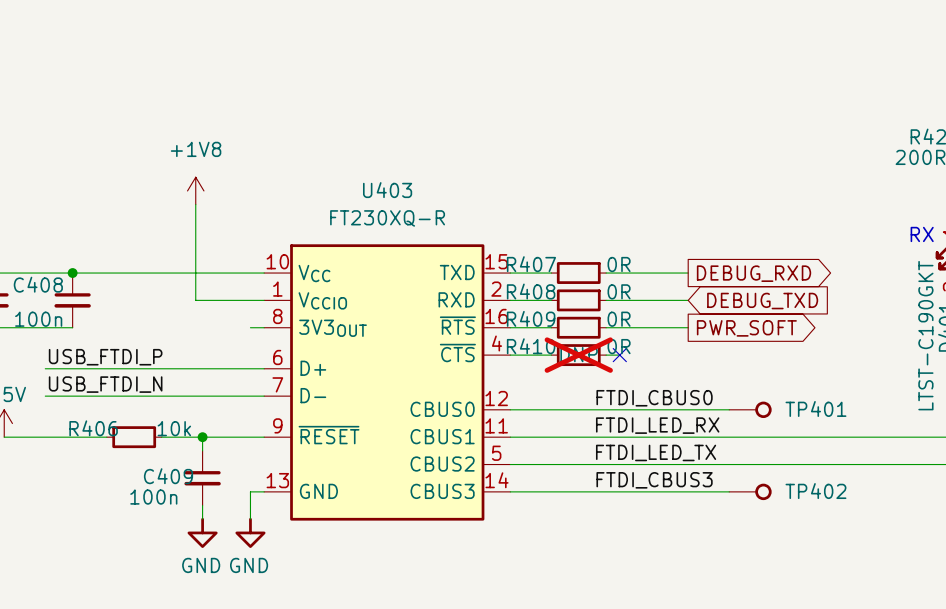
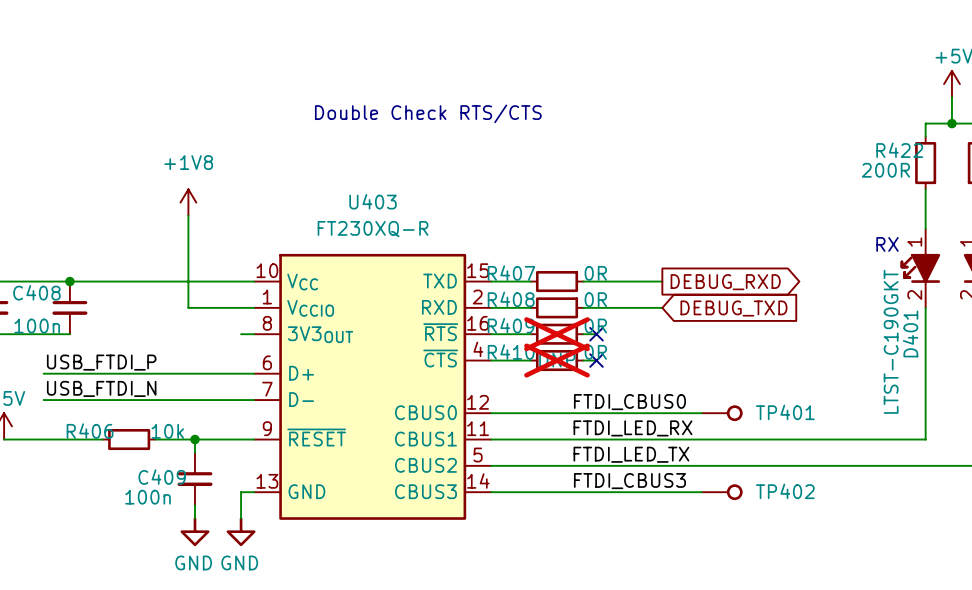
text: none -> Double Check RTS/CTS (428, 113)
R409 do-not-place cross: none -> (557, 334)
wire: (619, 327) (688, 327) -> none
no-connect mark: none -> (596, 334)
global label: PWR_SOFT (746, 328) -> none

